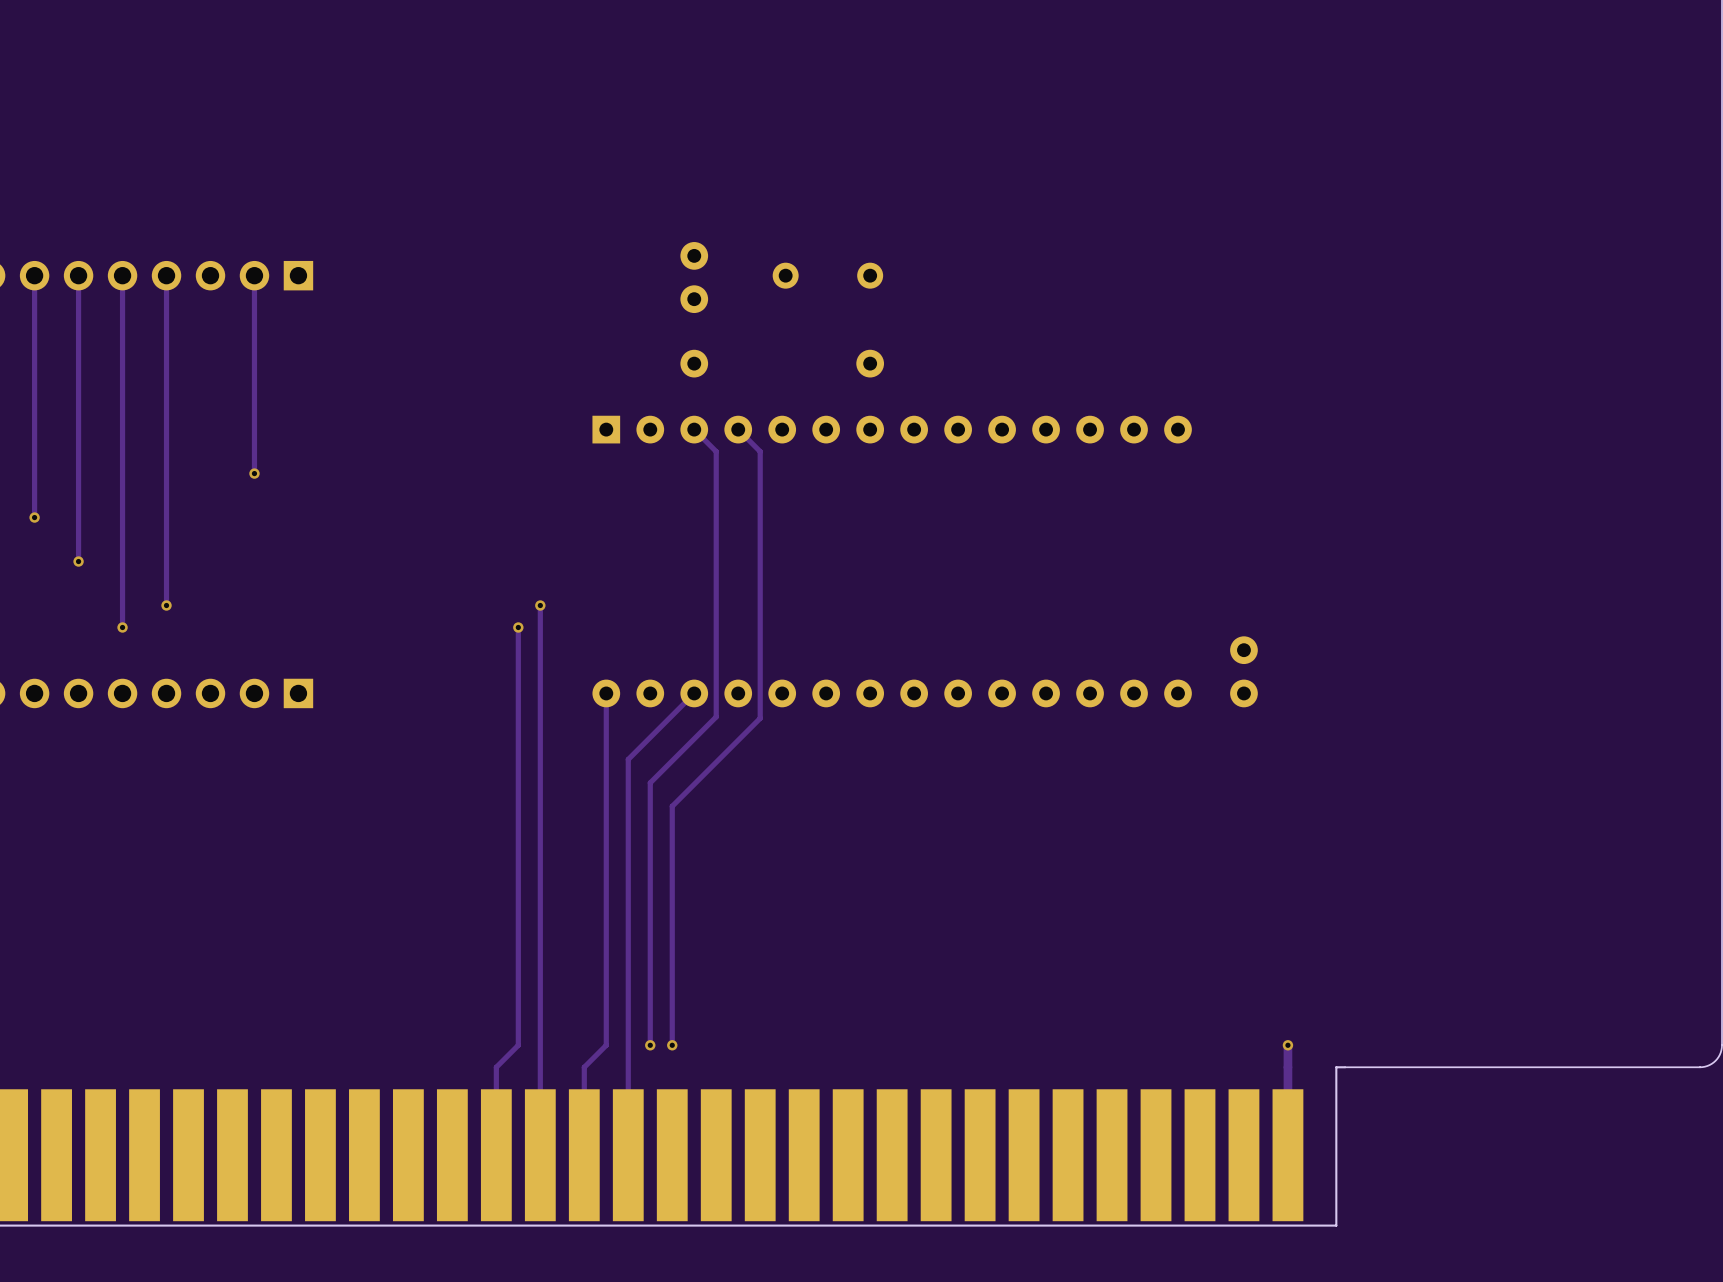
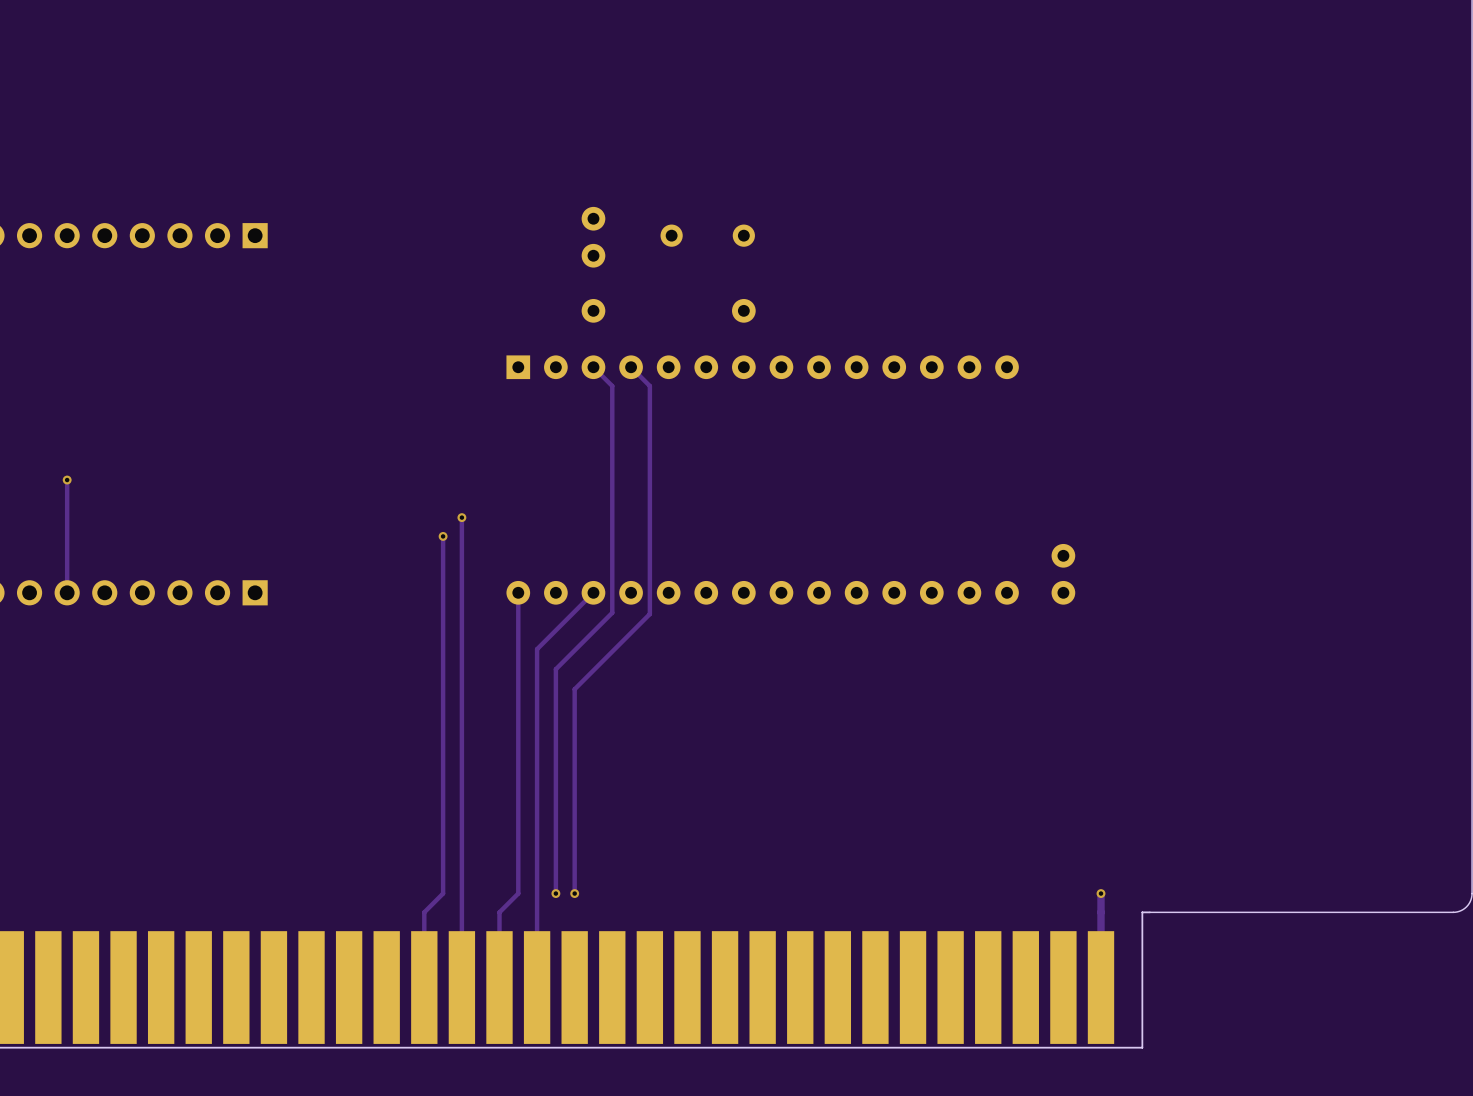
track: (34, 275) (34, 517) -> none
track: (78, 275) (78, 561) -> (67, 592) (67, 480)
track: (122, 275) (122, 627) -> none
track: (166, 275) (166, 605) -> none
track: (254, 275) (254, 473) -> none
via: (254, 473) -> none
via: (34, 517) -> none
via: (166, 605) -> none
via: (122, 627) -> none

